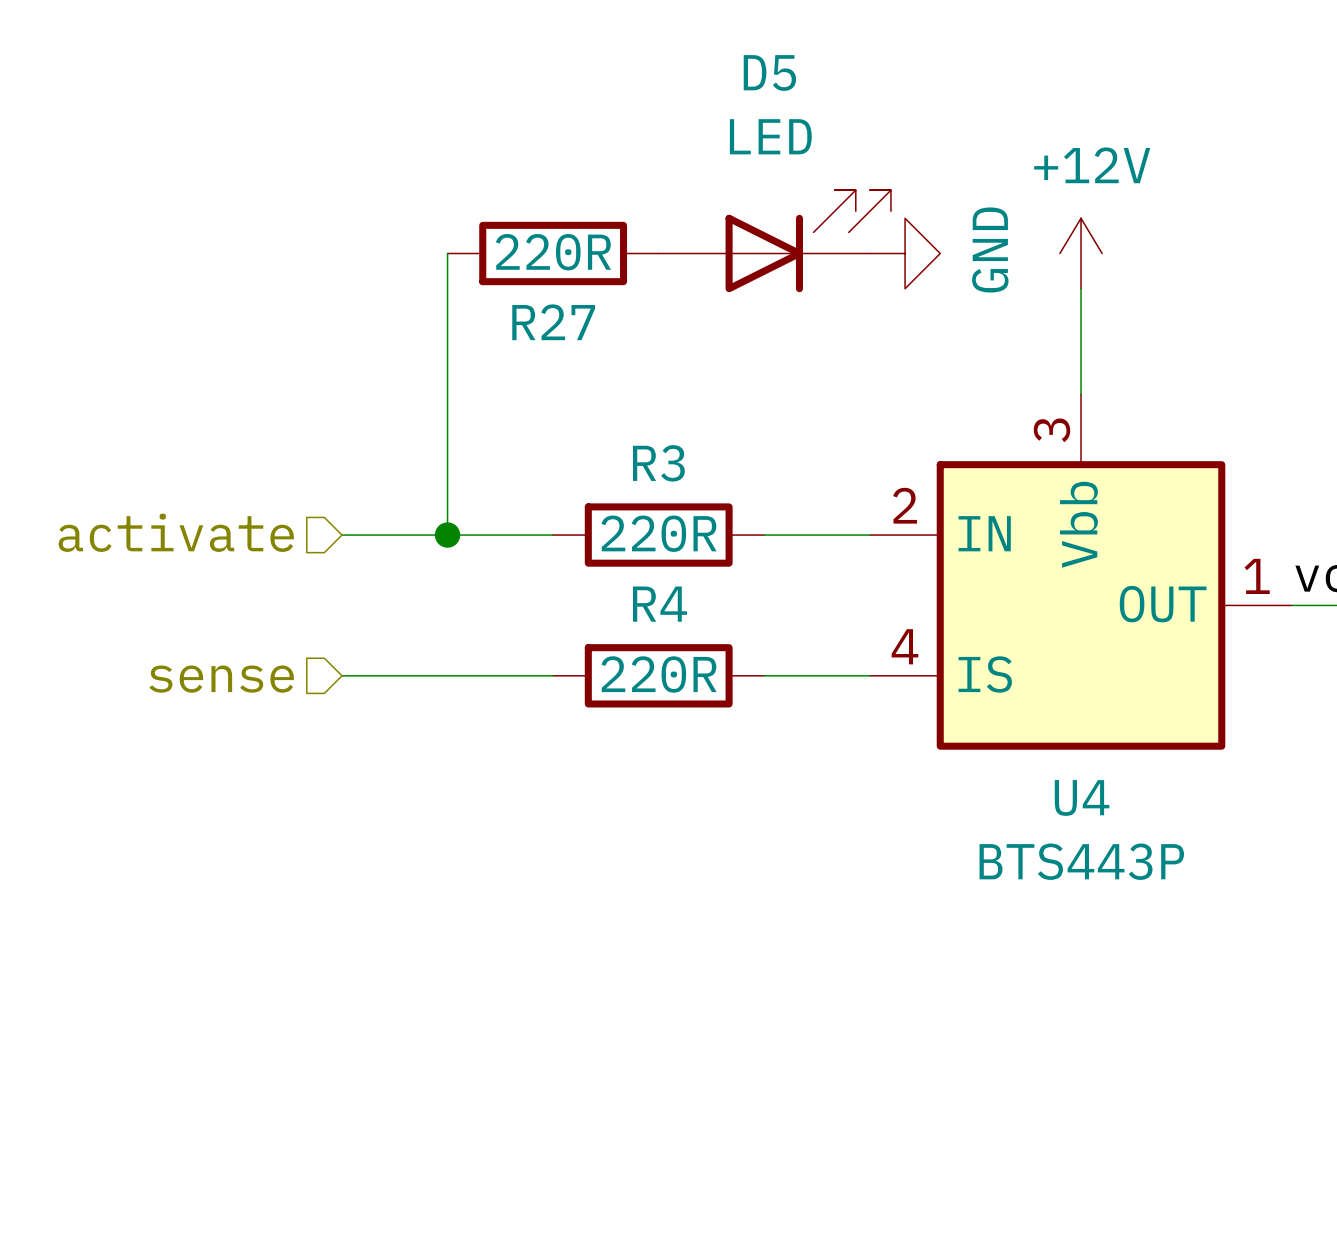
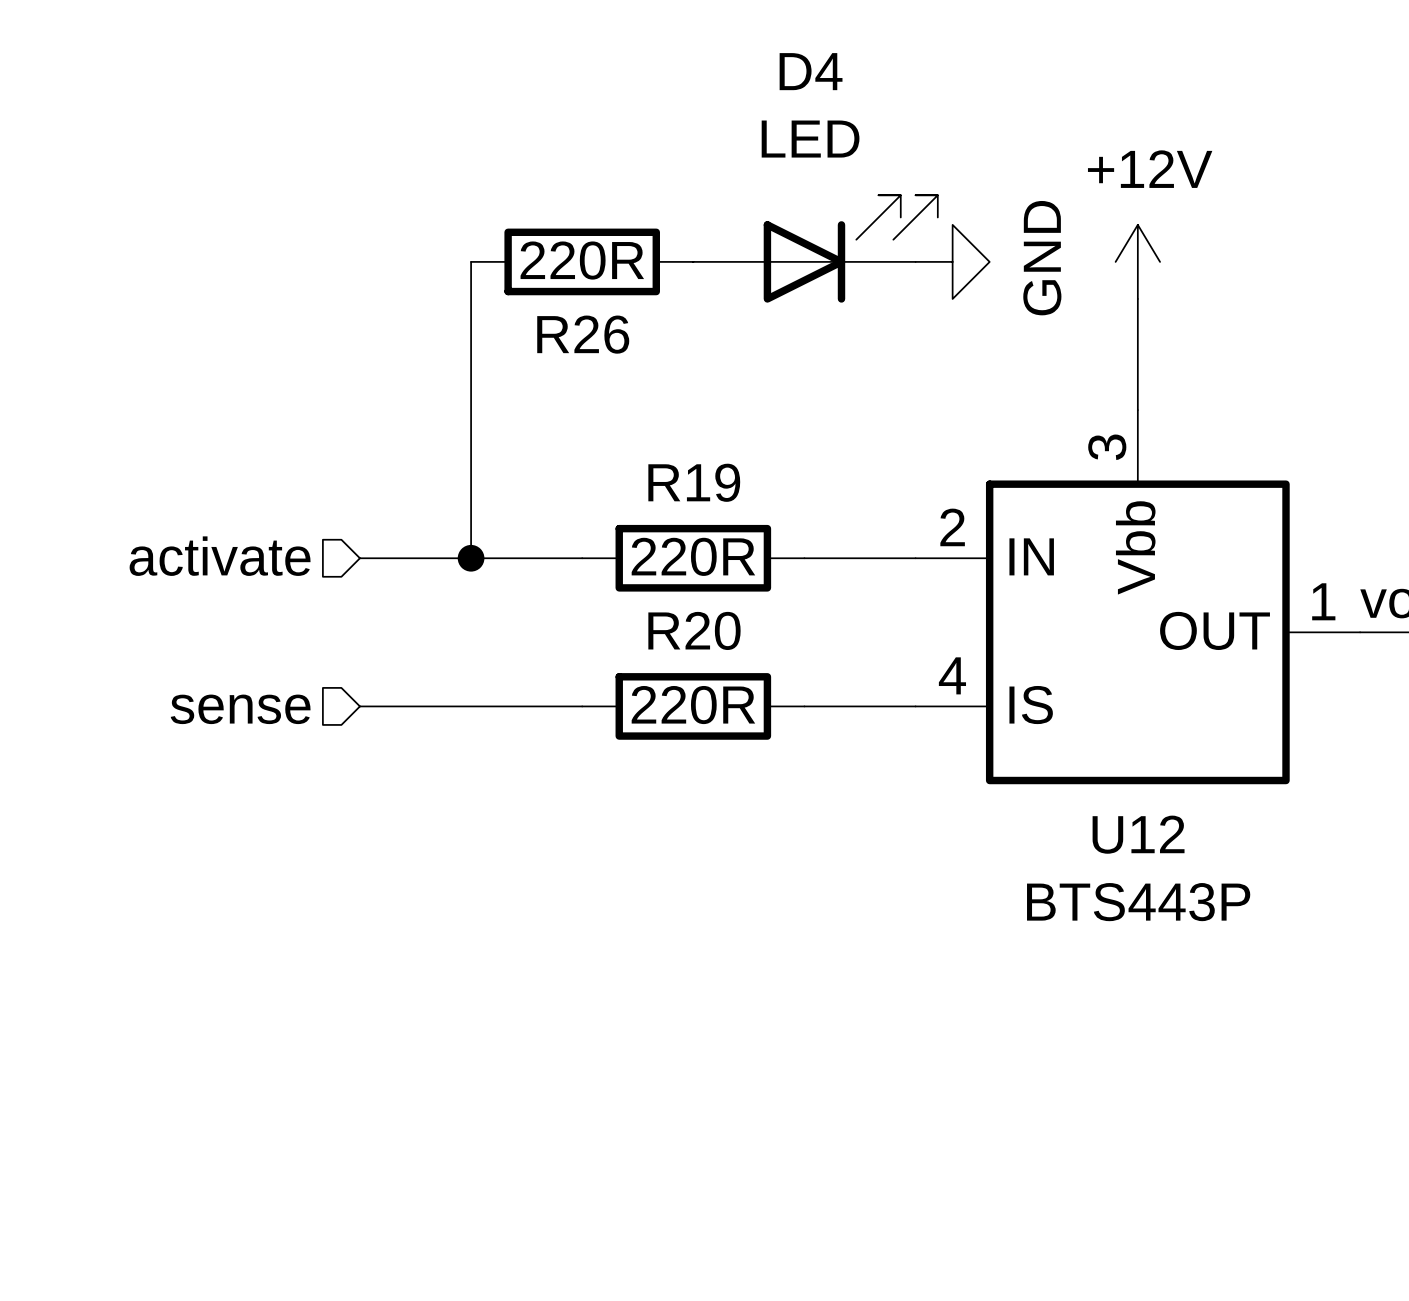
D5 name: D5 (769, 73) -> D4 (811, 71)
R27 name: R27 (553, 322) -> R26 (583, 334)
R3 name: R3 (658, 463) -> R19 (694, 482)
R4 name: R4 (660, 604) -> R20 (694, 630)
U4 name: U4 (1082, 797) -> U12 (1138, 834)

